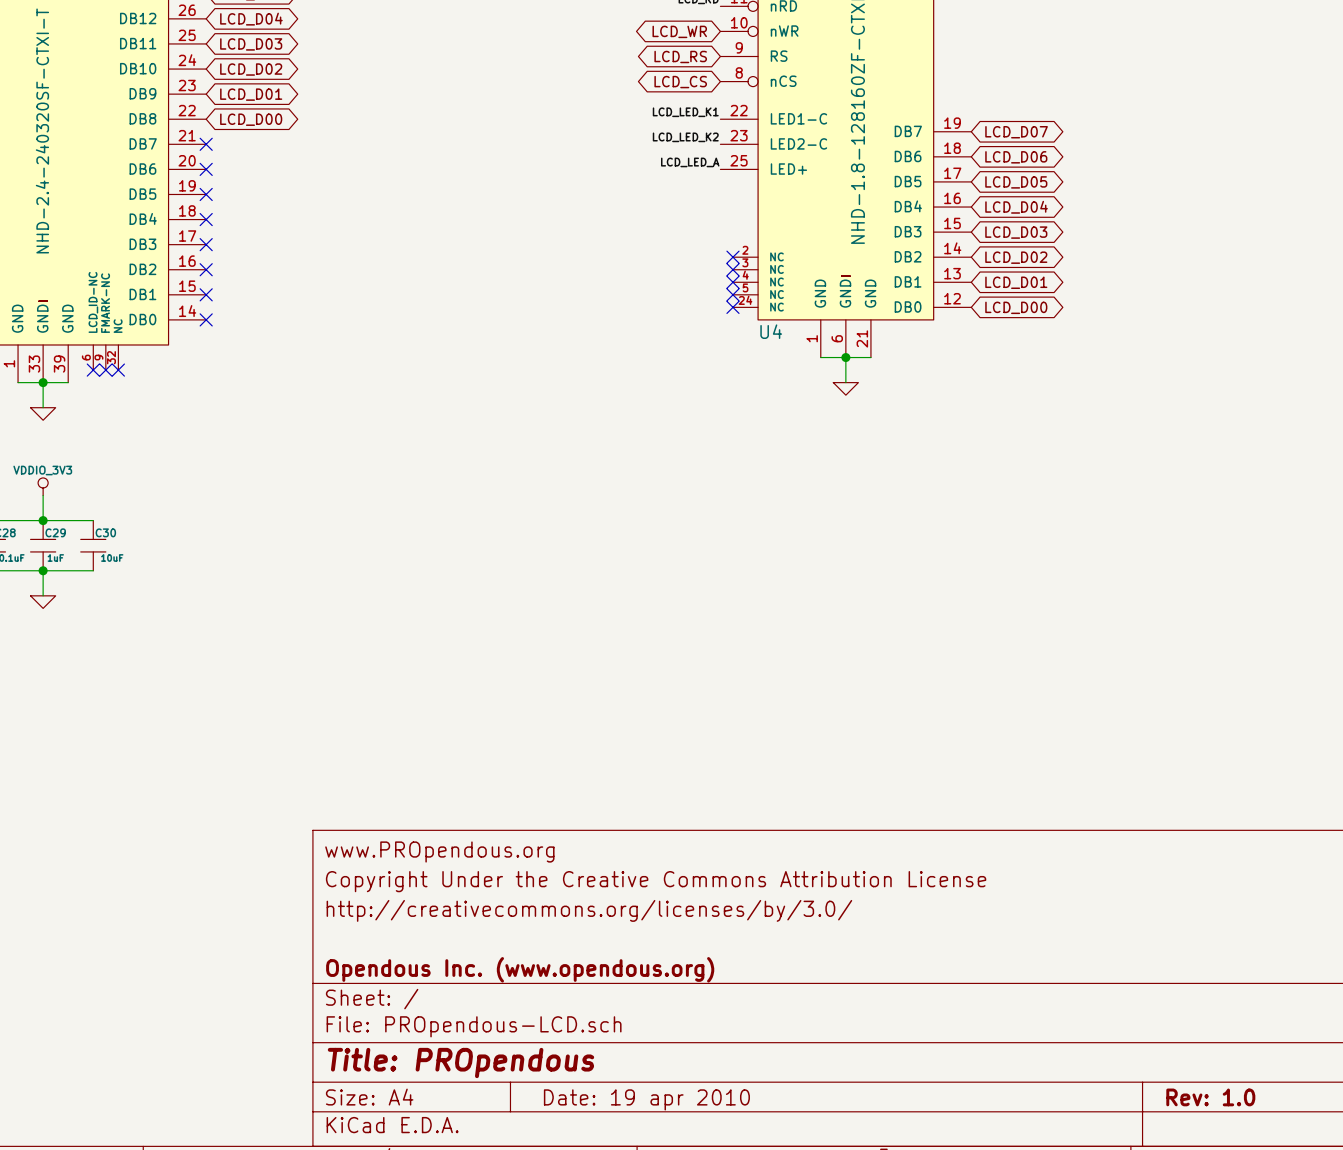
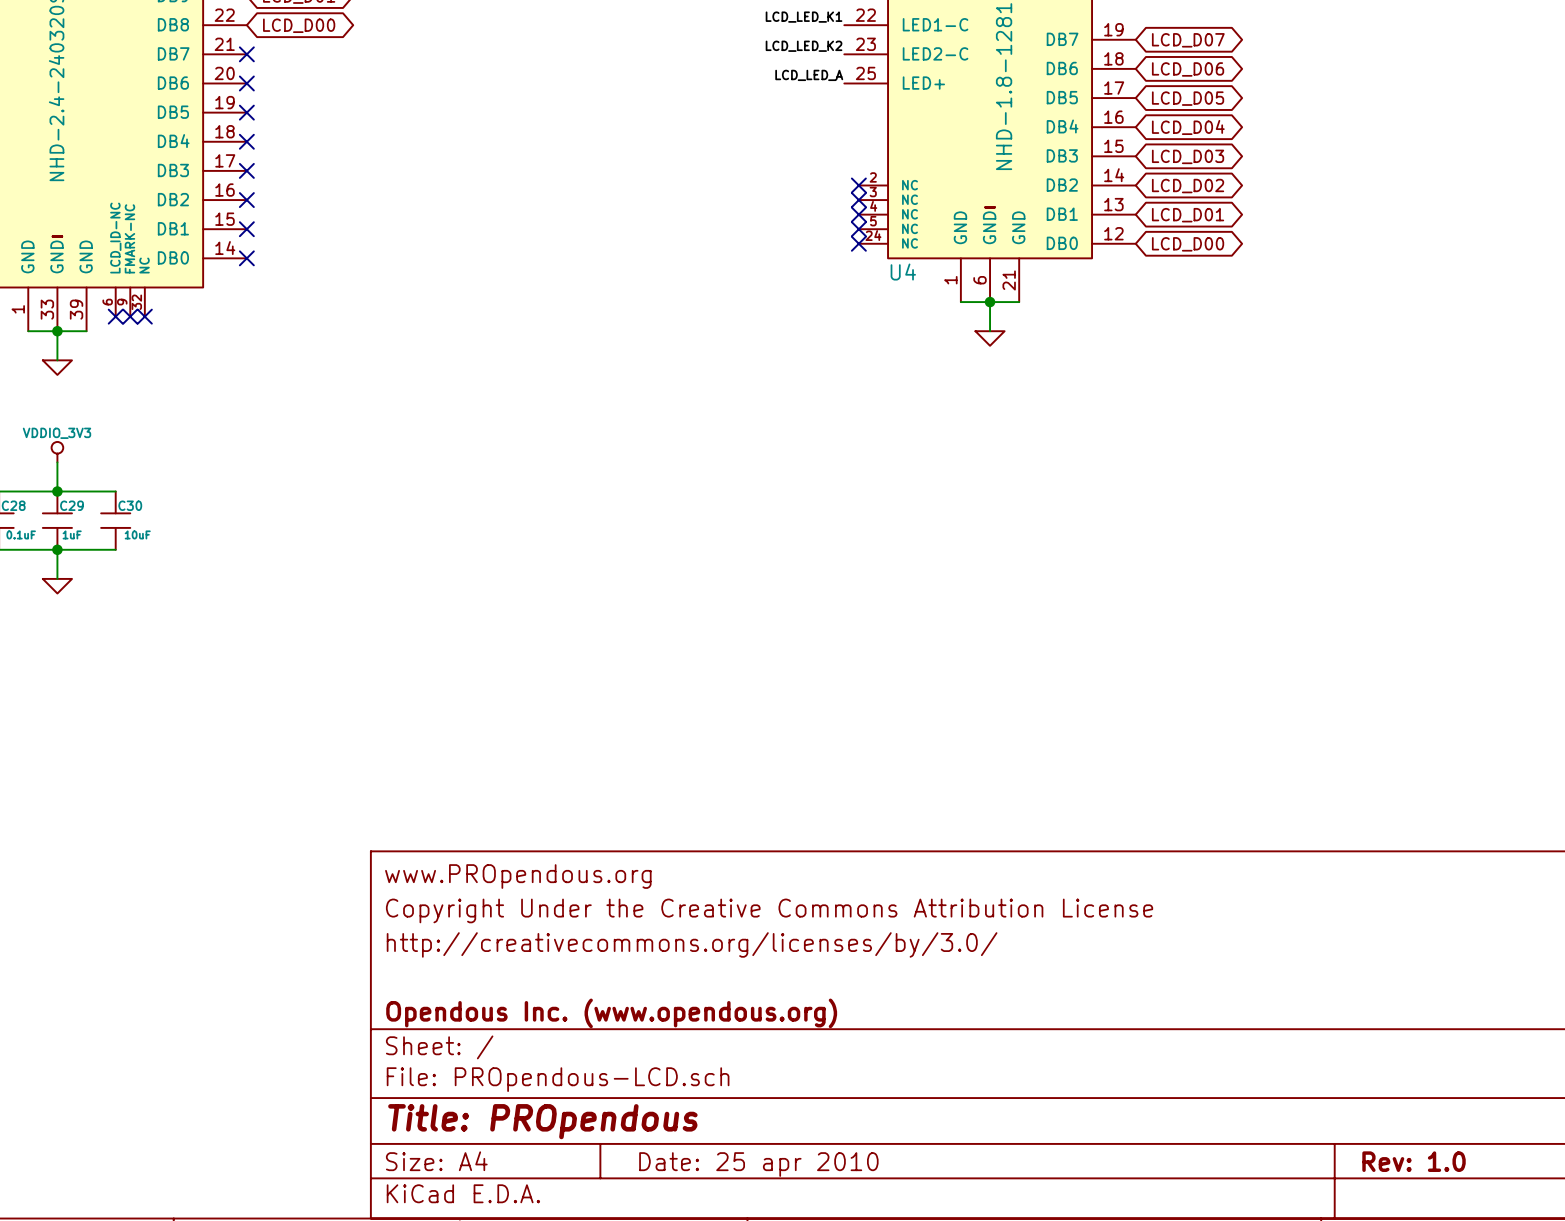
title block: Date: 19 apr 2010 (646, 1099) -> Date: 25 apr 2010 (758, 1164)

